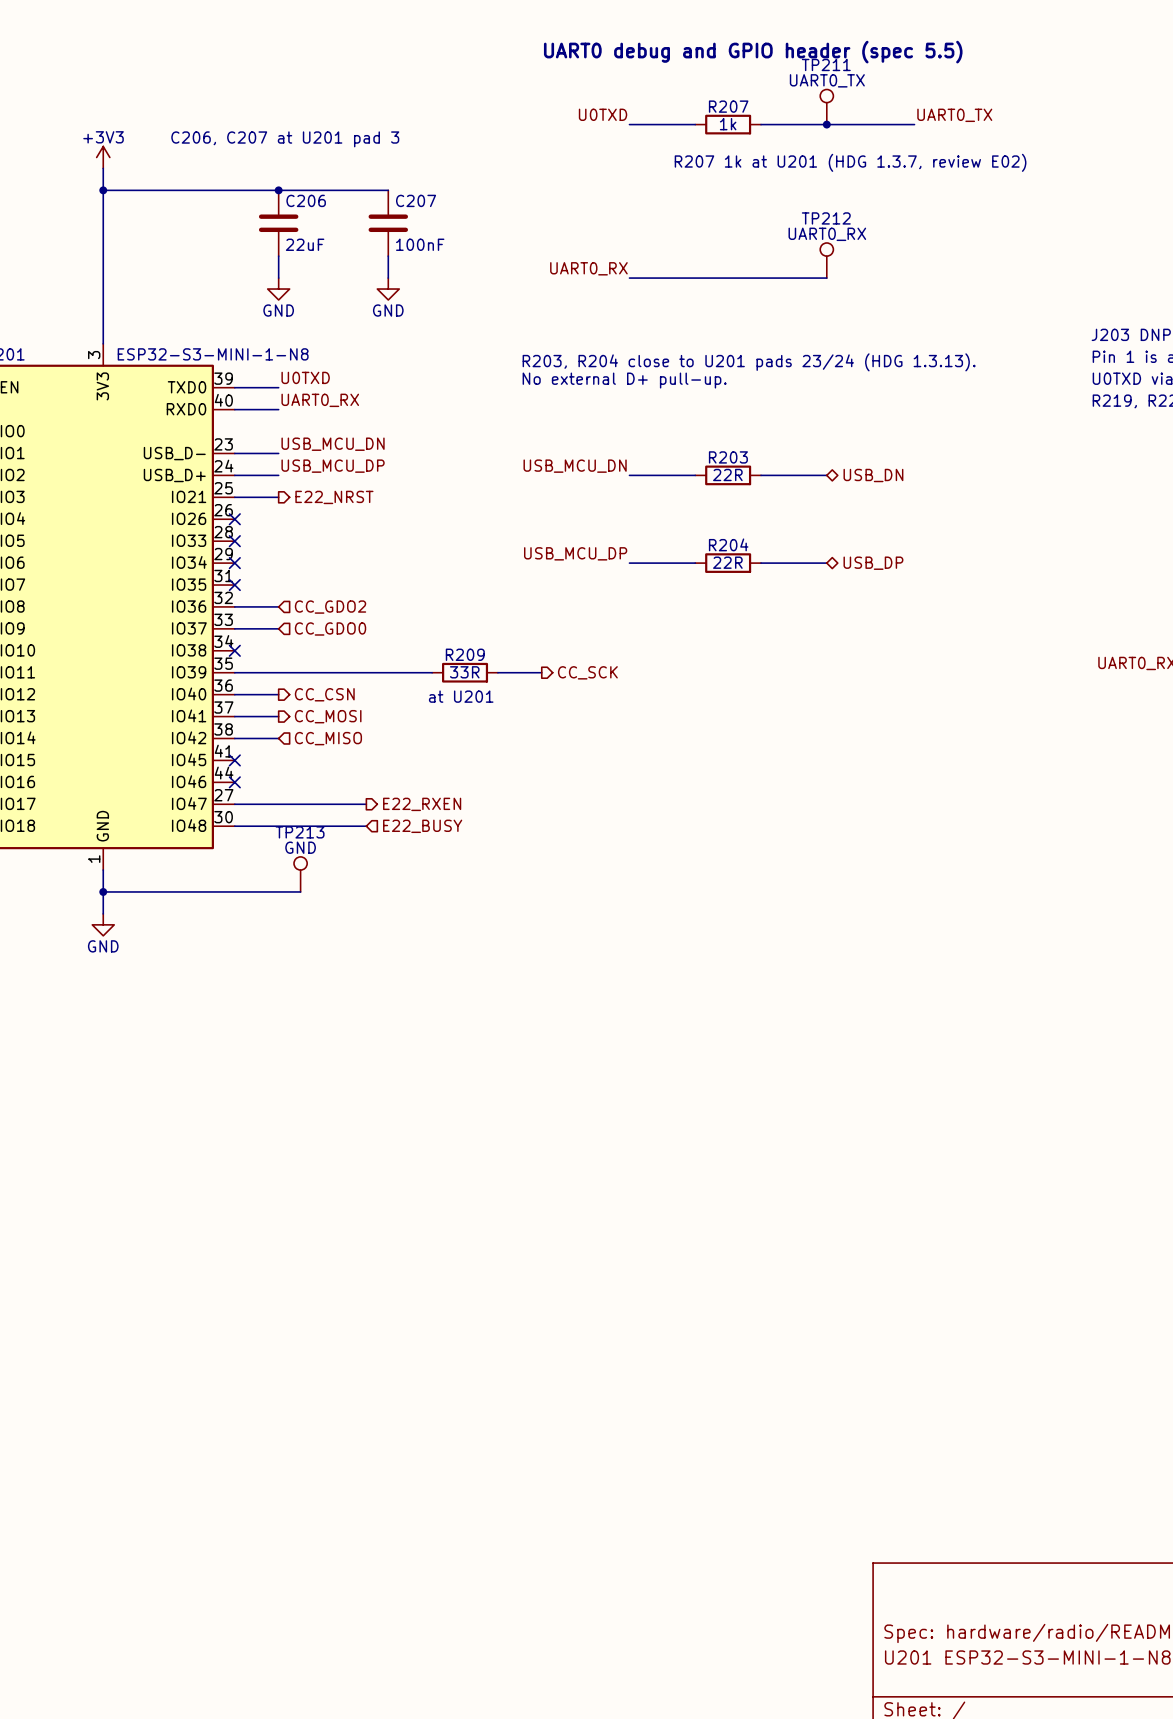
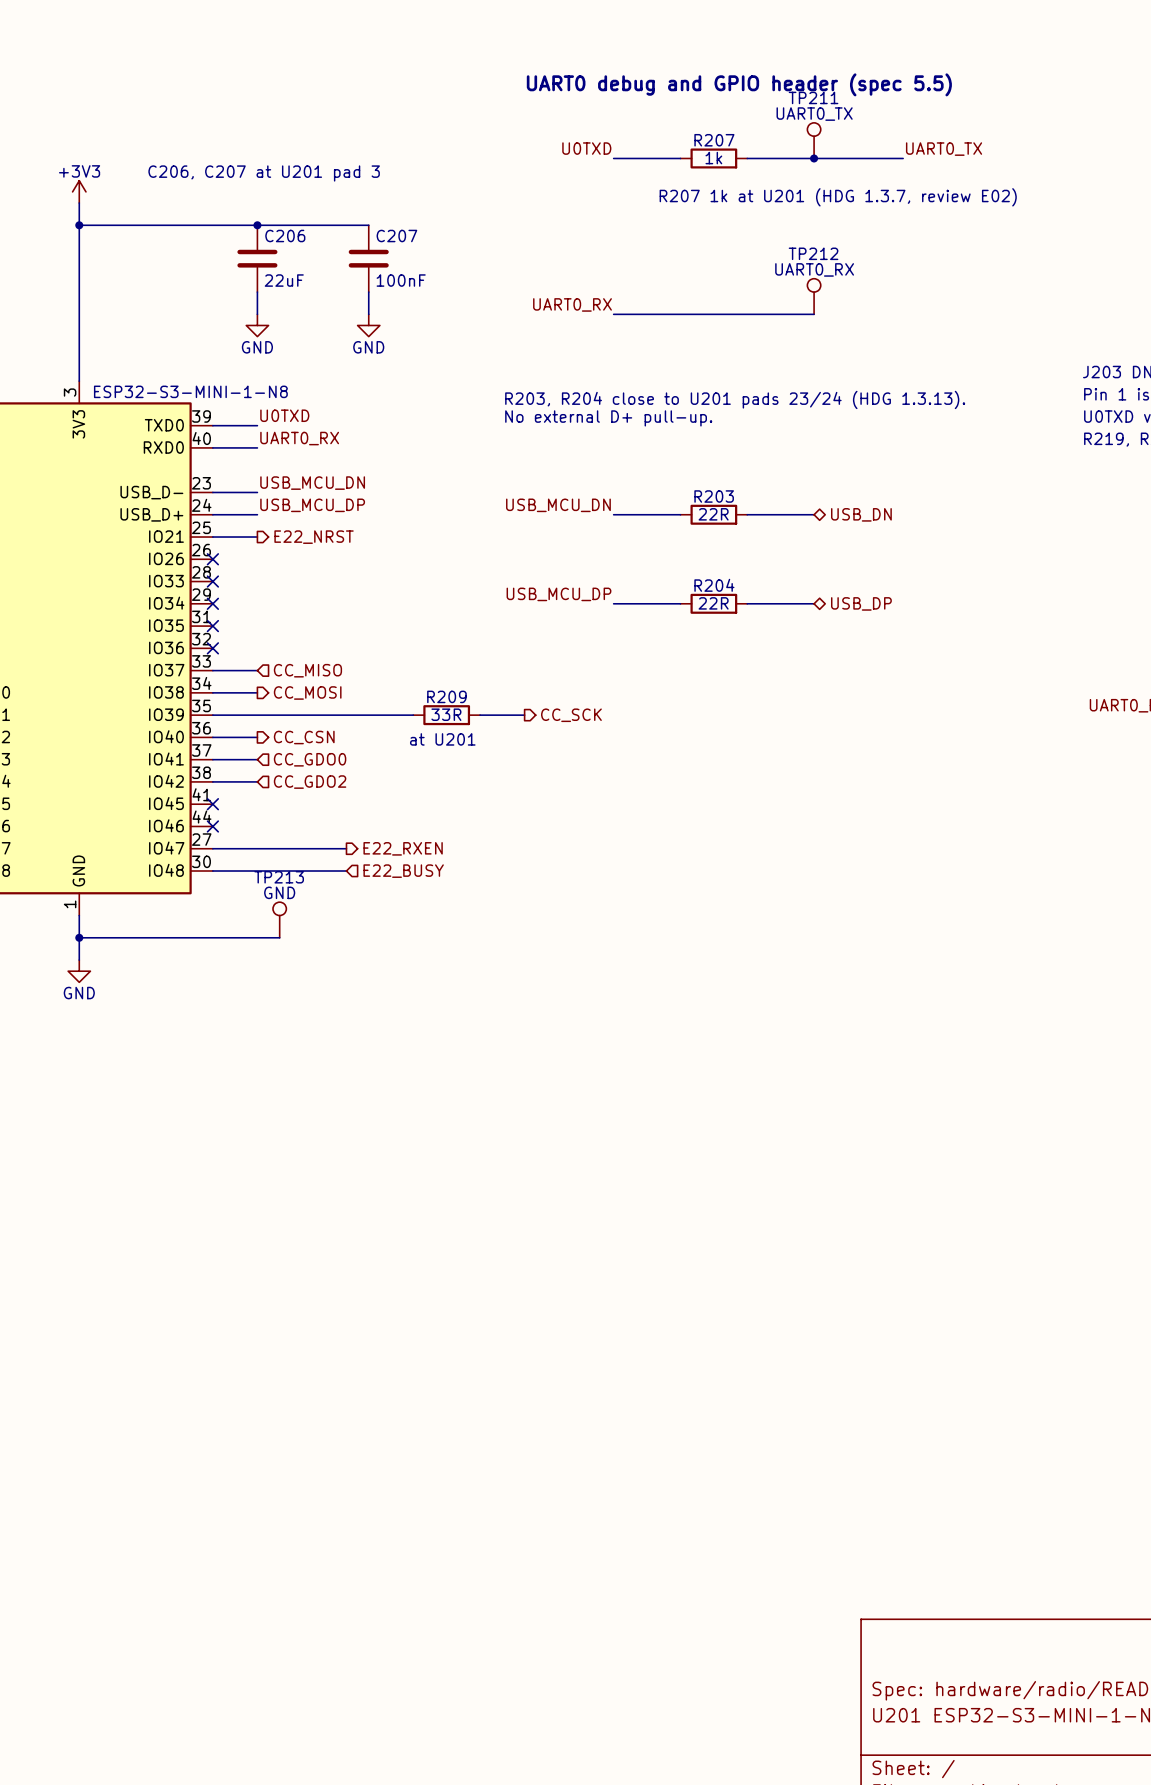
wire: (234, 606) (278, 606) -> (212, 692) (257, 692)
hierarchical label: CC_GDO2 (330, 607) -> none
hierarchical label: CC_GDO0 (330, 628) -> CC_MISO (307, 670)
no-connect mark position: (234, 650) -> (212, 648)
hierarchical label: none -> CC_MOSI (307, 692)
hierarchical label shape: output (328, 716) -> input (310, 759)
hierarchical label: CC_MOSI (328, 716) -> CC_GDO0 (310, 759)
hierarchical label: CC_MISO (328, 738) -> CC_GDO2 (310, 782)

